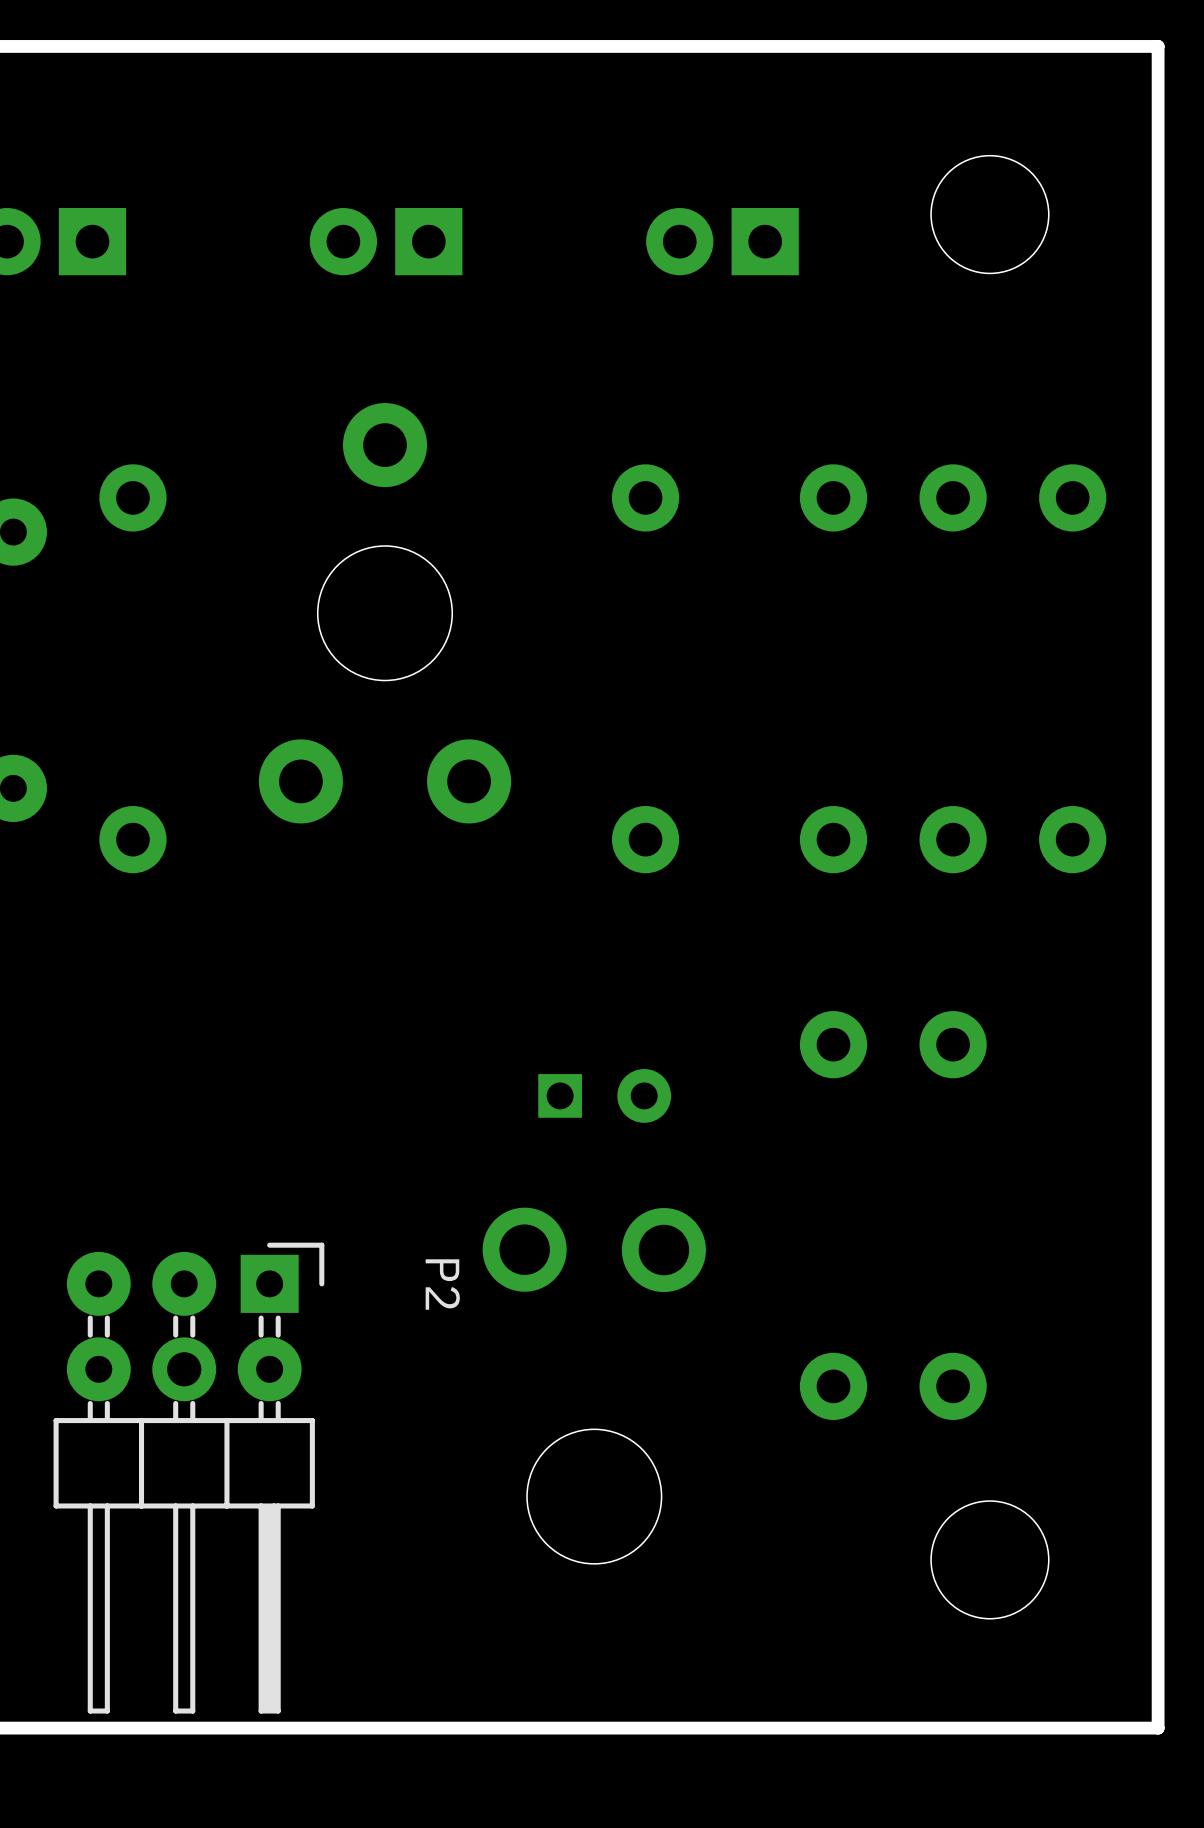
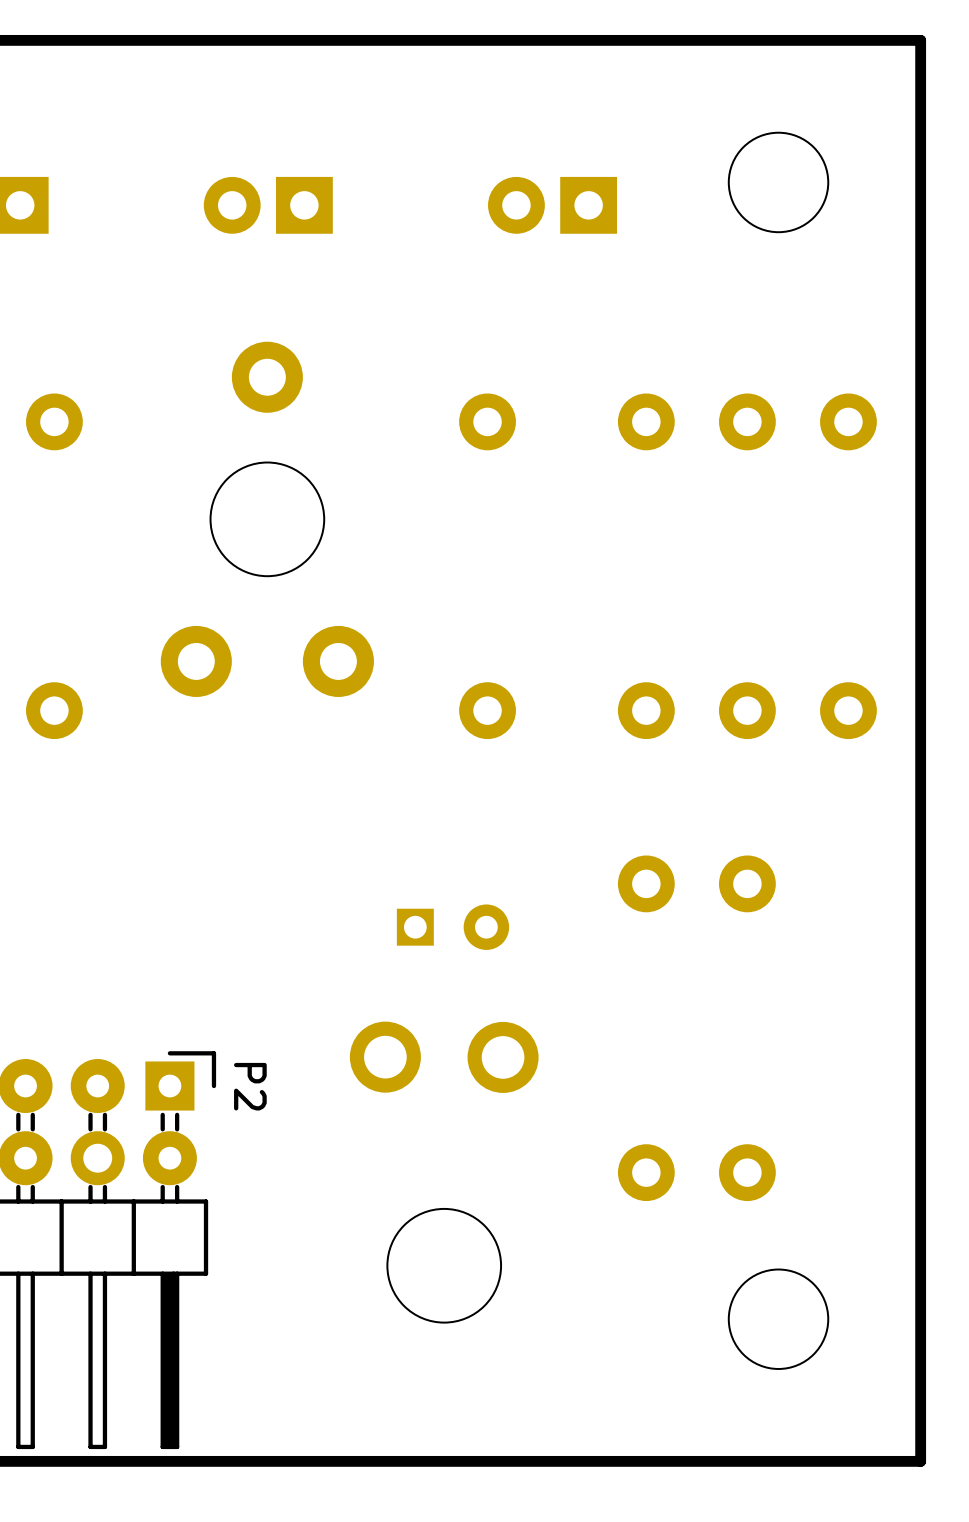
P2 name position: P2 (442, 1284) -> P2 (250, 1086)

